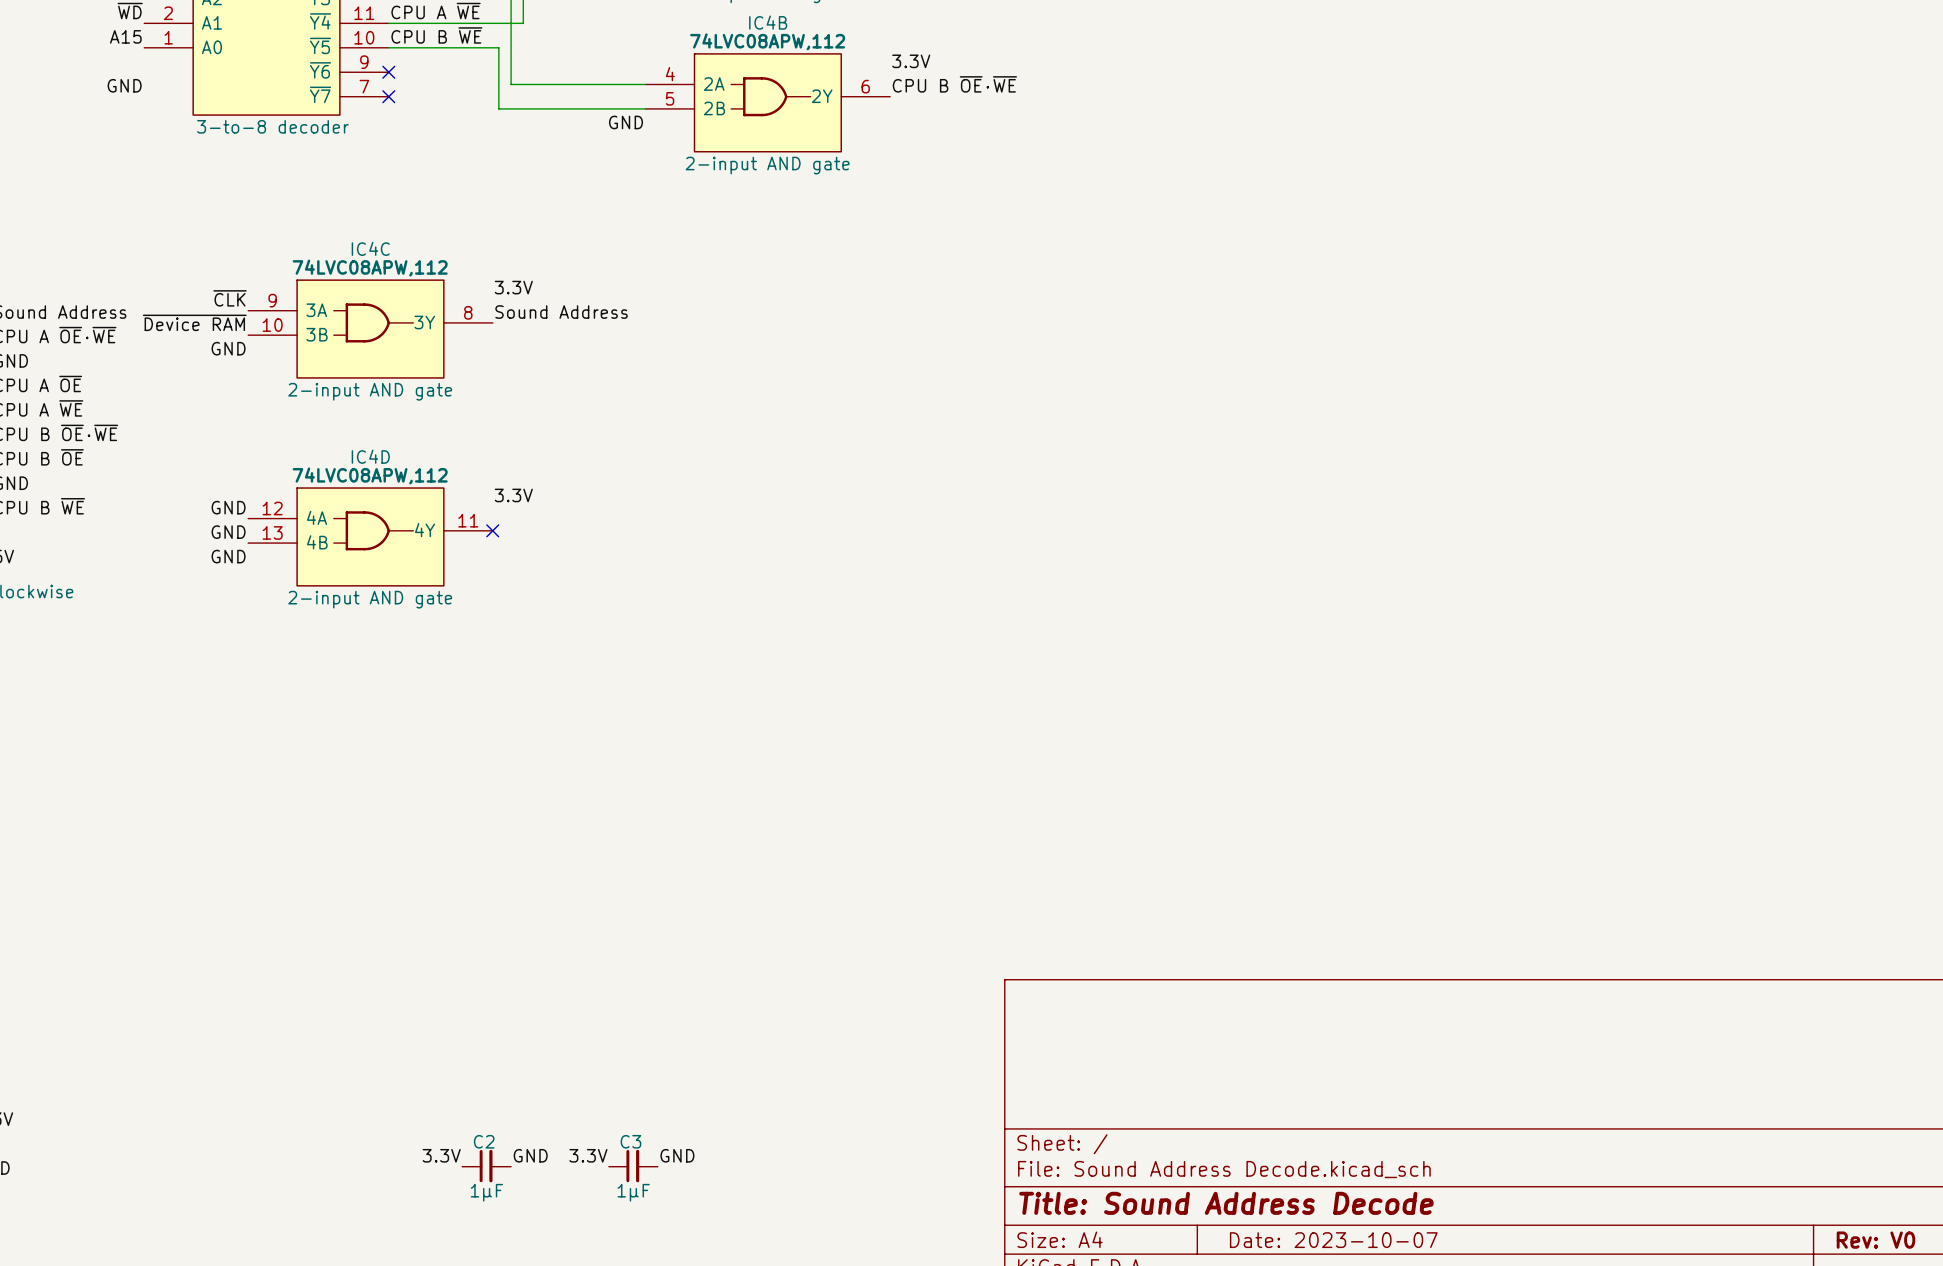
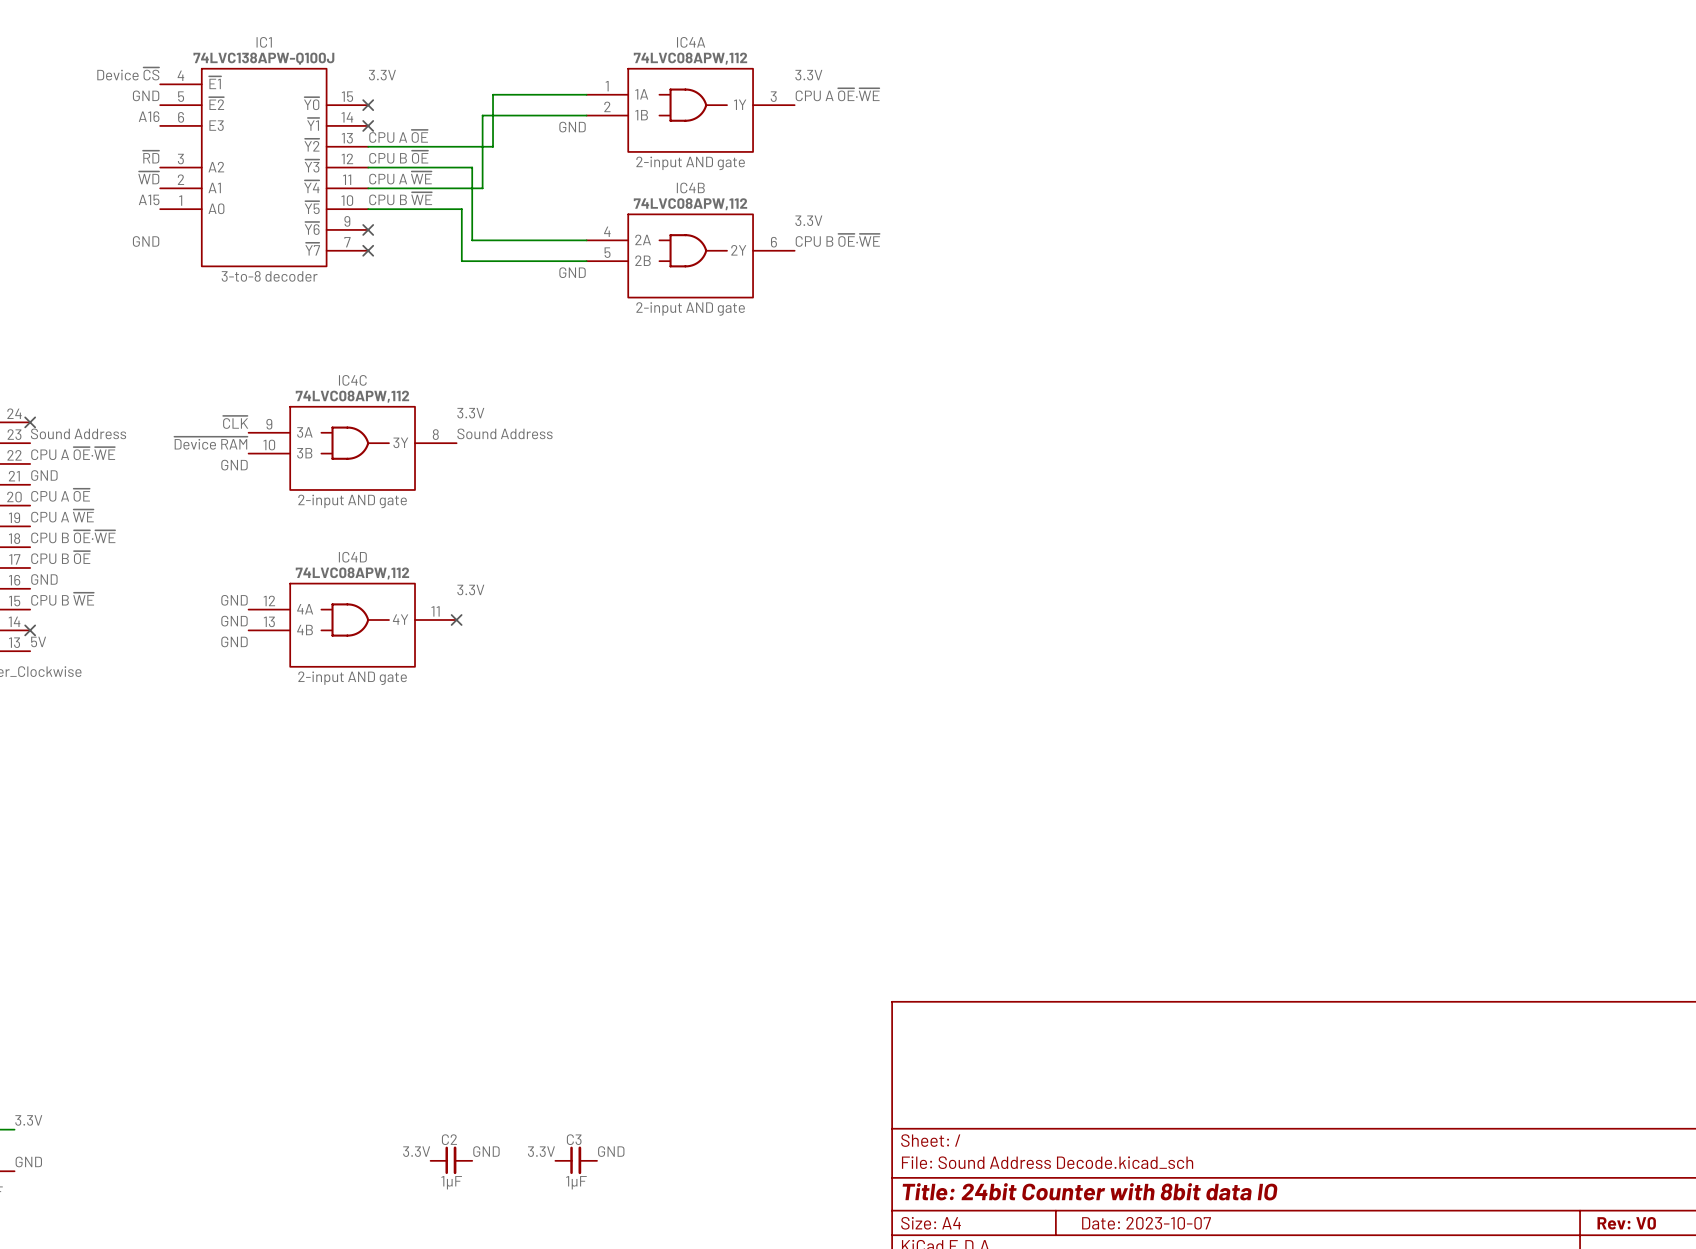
title block: Title: Sound Address Decode (1226, 1203) -> Title: 24bit Counter with 8bit data IO (1090, 1191)

